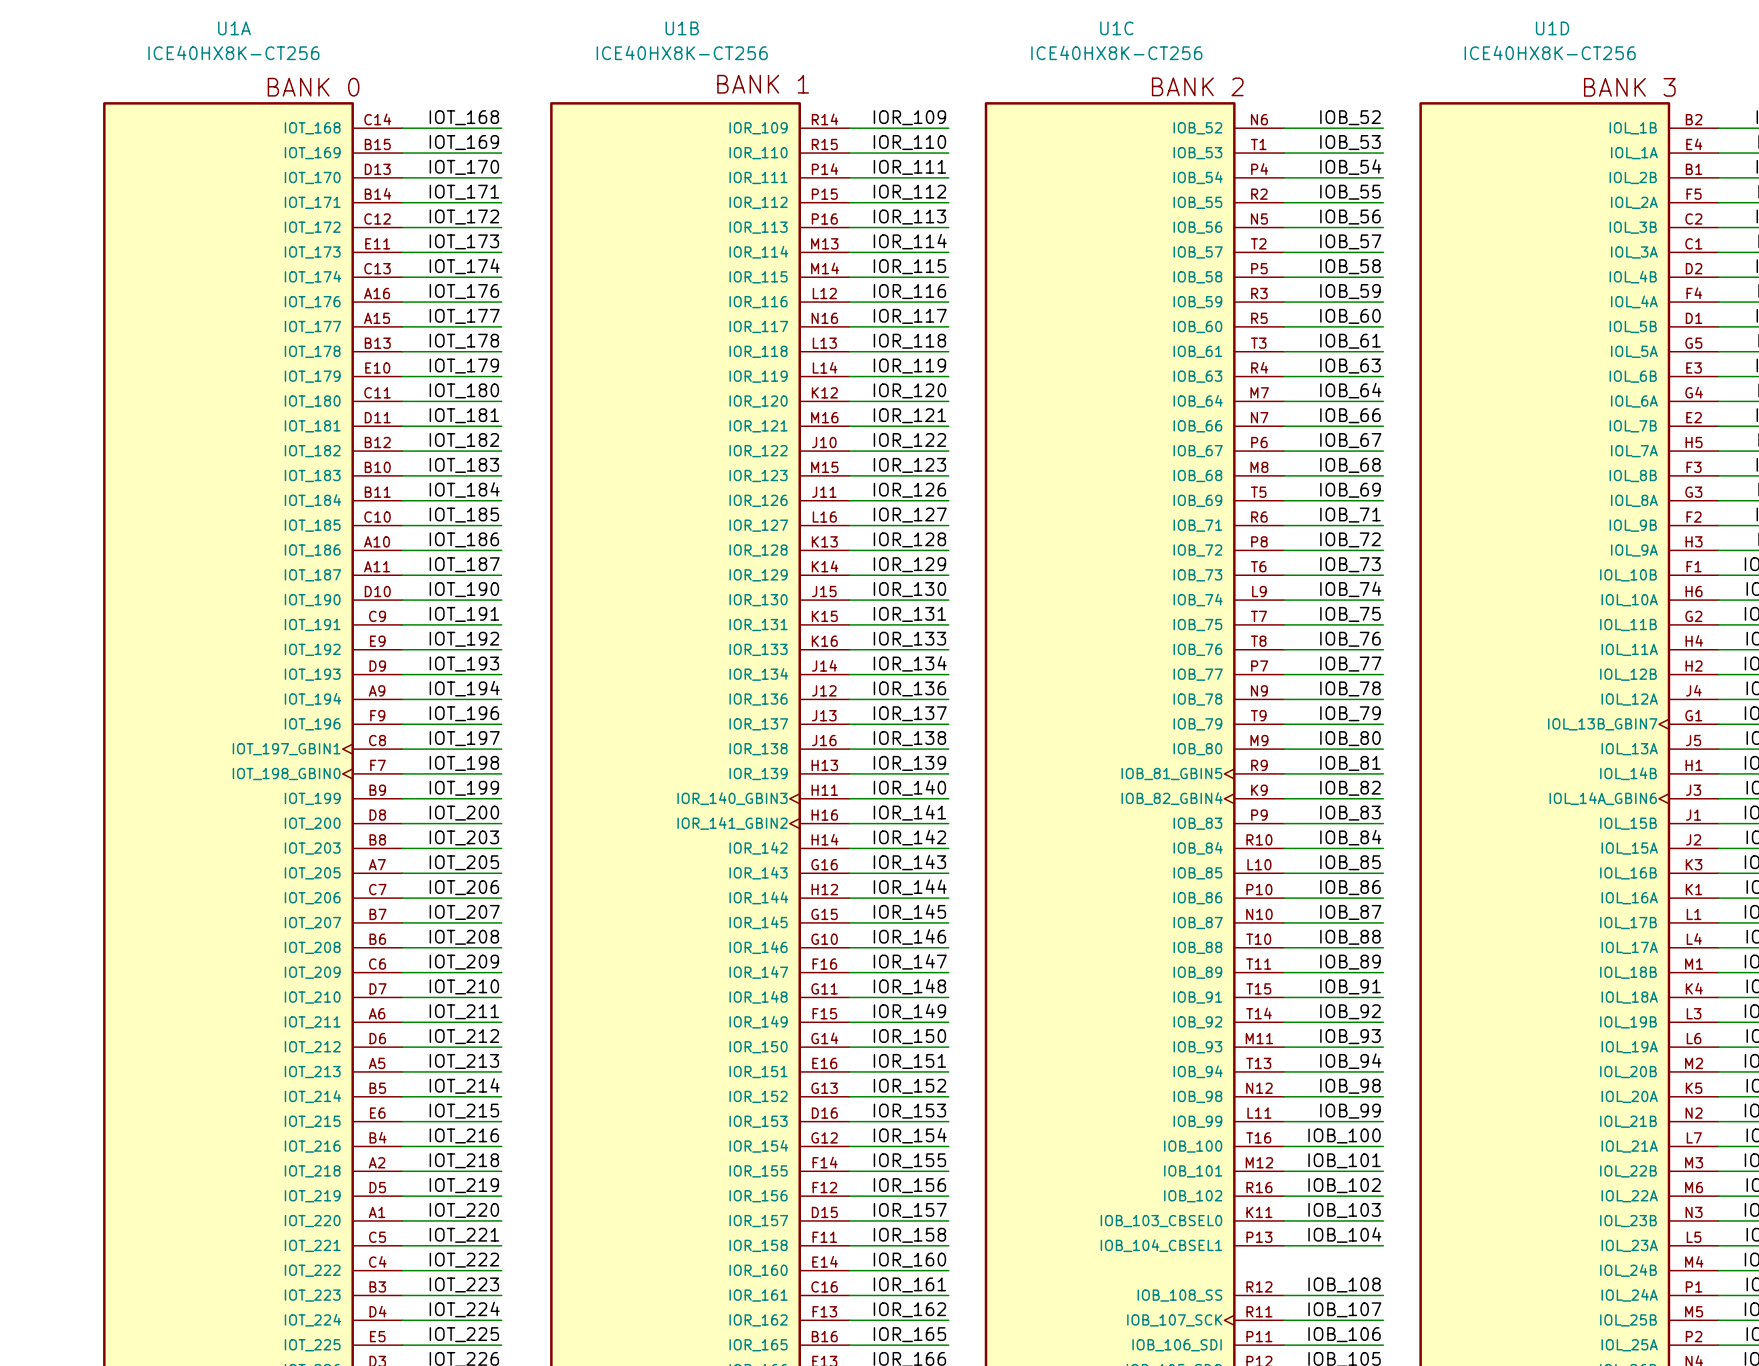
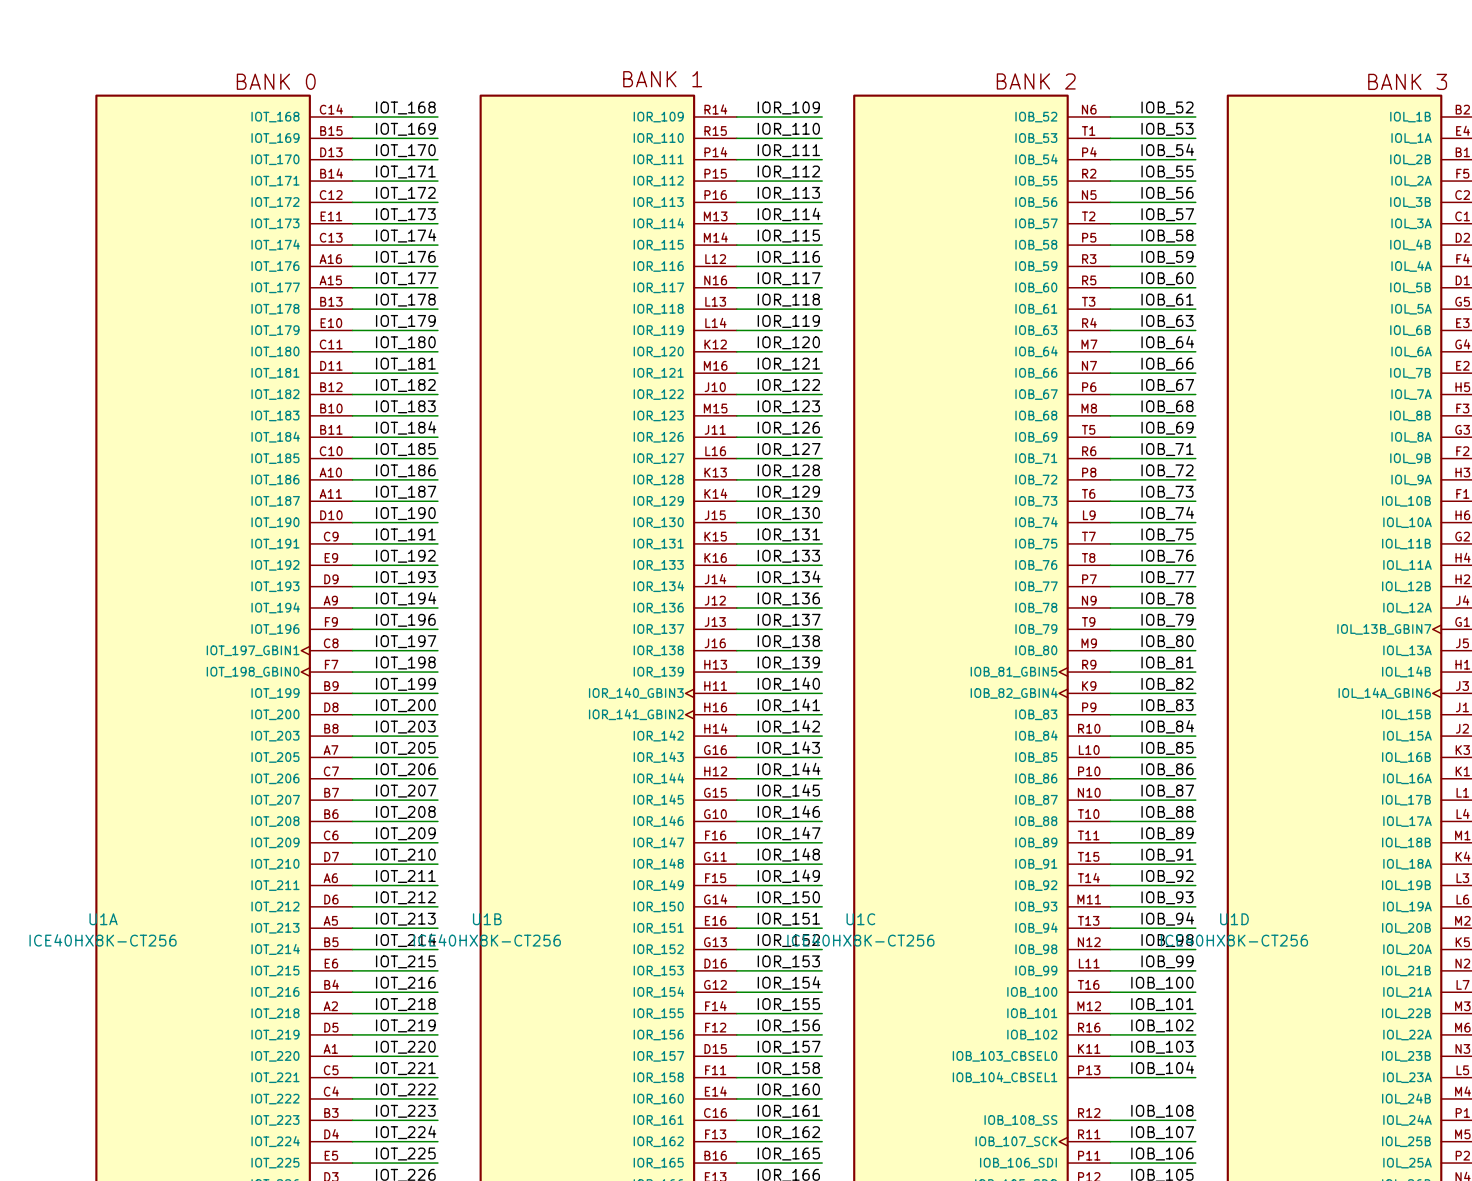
U1A name position: U1A (234, 28) -> U1A (103, 919)
U1B name position: U1B (682, 28) -> U1B (487, 919)
U1C name position: U1C (1116, 28) -> U1C (860, 919)
U1D name position: U1D (1552, 28) -> U1D (1234, 919)
U1A value position: ICE40HX8K-CT256 (233, 52) -> ICE40HX8K-CT256 (103, 940)
U1B value position: ICE40HX8K-CT256 (682, 52) -> ICE40HX8K-CT256 (487, 940)
U1C value position: ICE40HX8K-CT256 (1116, 52) -> ICE40HX8K-CT256 (860, 940)
U1D value position: ICE40HX8K-CT256 (1550, 52) -> ICE40HX8K-CT256 (1234, 940)

